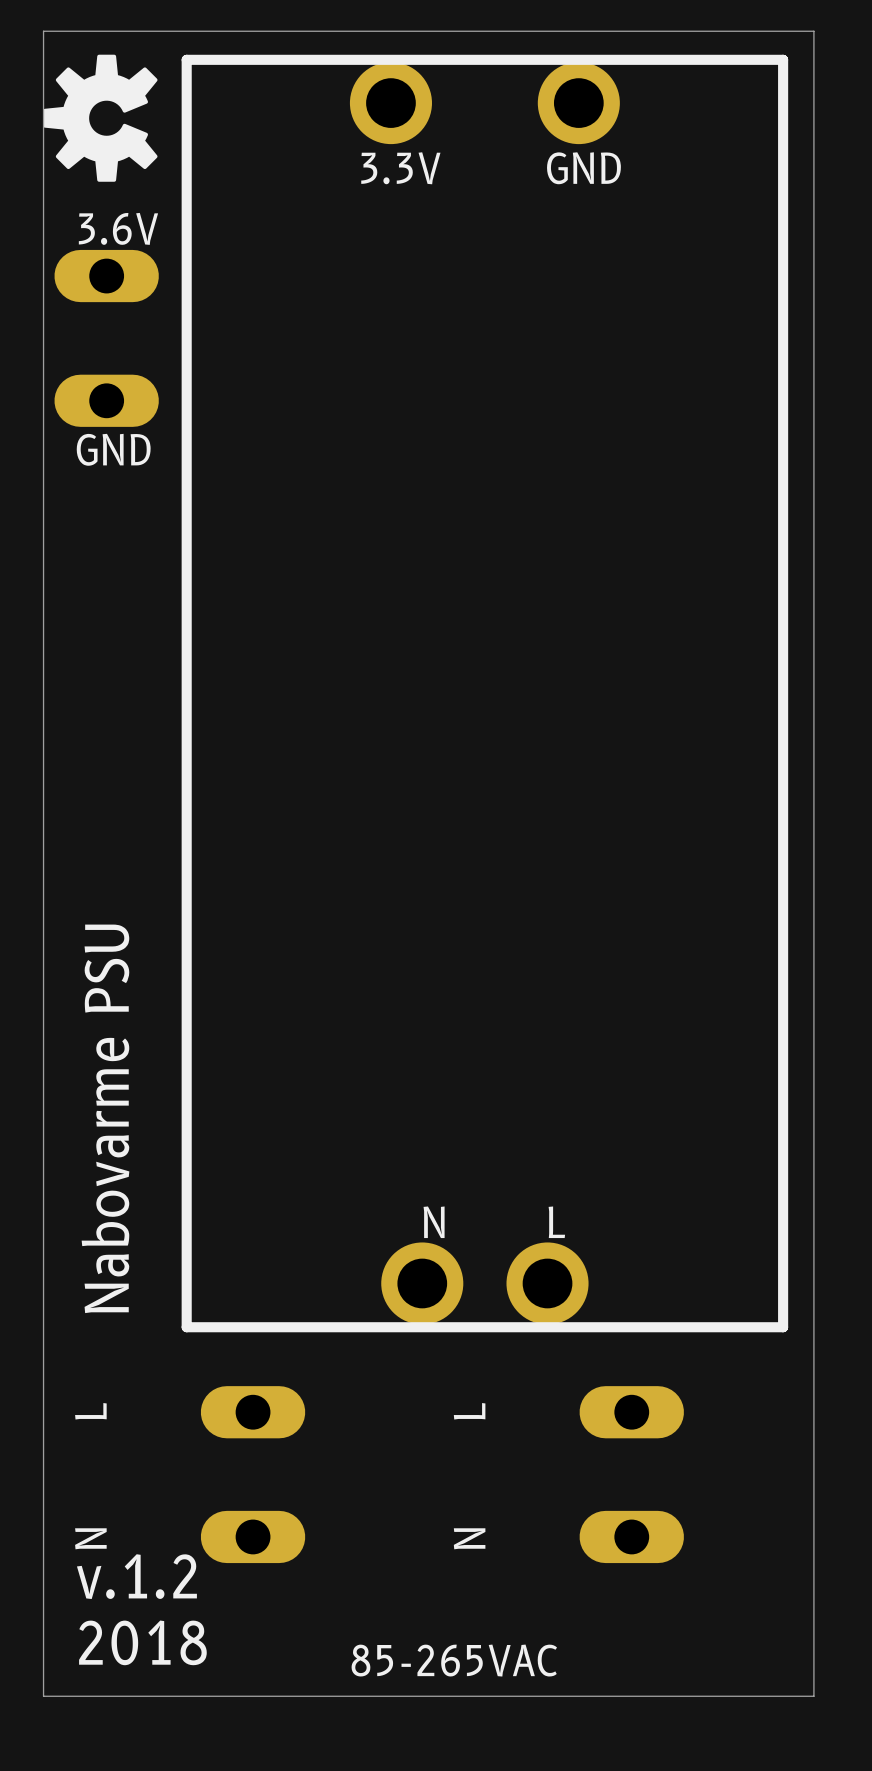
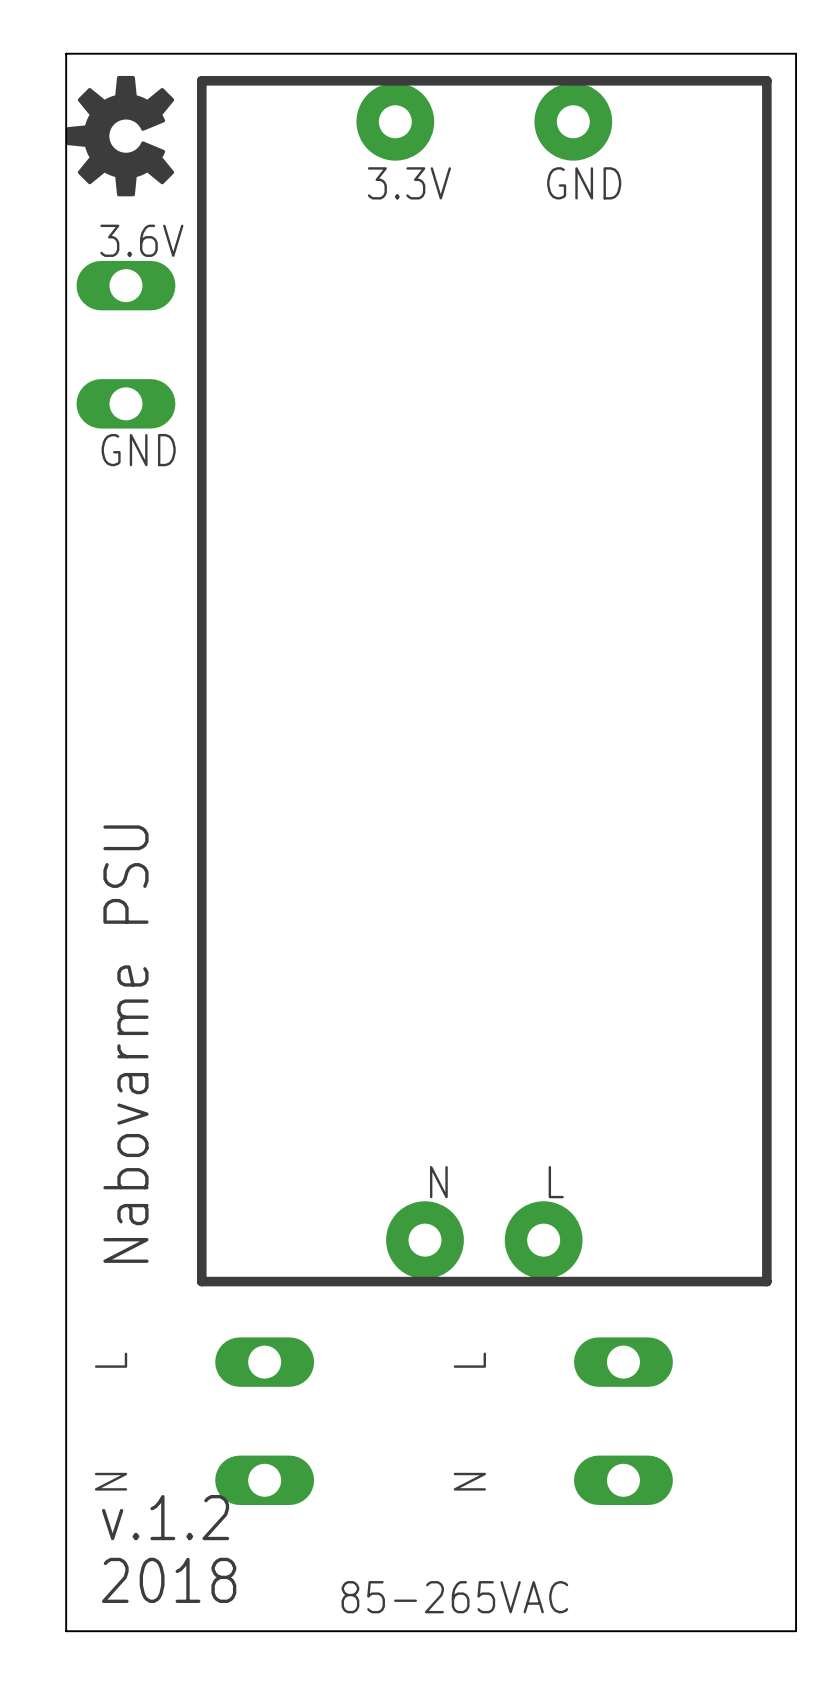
3.3V footprint: [349, 62, 432, 145] -> [356, 82, 435, 161]
GND footprint: [537, 62, 620, 145] -> [534, 82, 613, 161]
N footprint: [381, 1242, 464, 1325] -> [386, 1201, 464, 1280]
L footprint: [506, 1242, 589, 1325] -> [504, 1201, 583, 1280]

